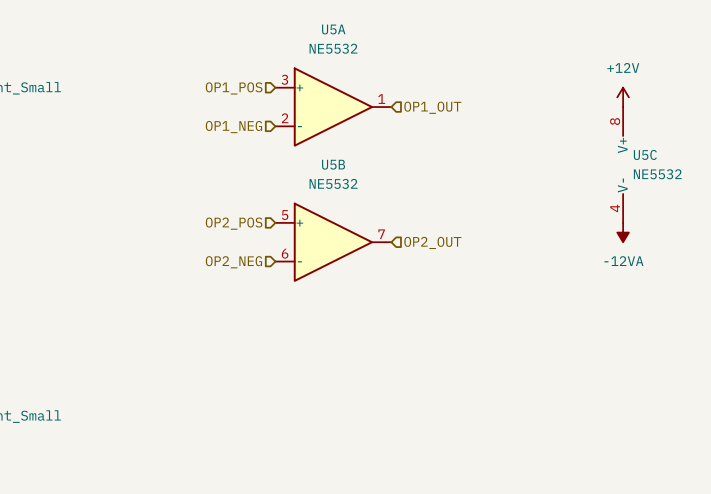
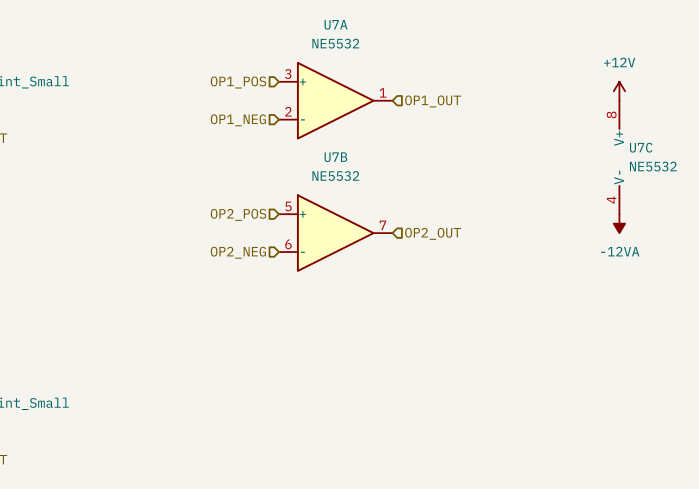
U5A name: U5A (333, 29) -> U7A (336, 24)
U5C name: U5C (645, 154) -> U7C (641, 147)
U5B name: U5B (333, 164) -> U7B (335, 157)

